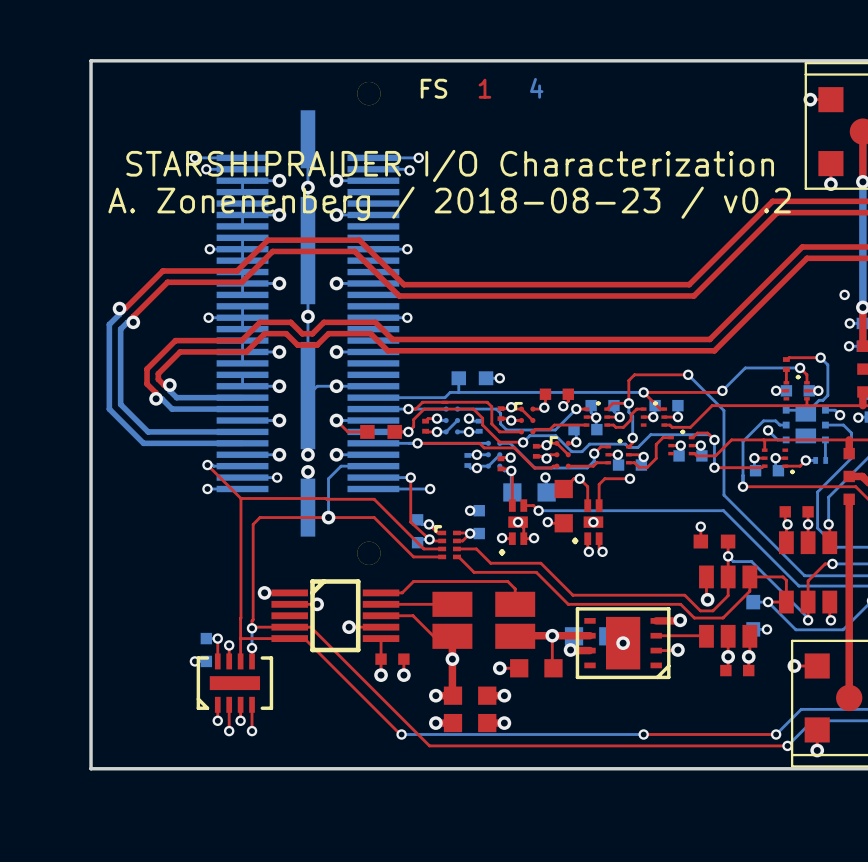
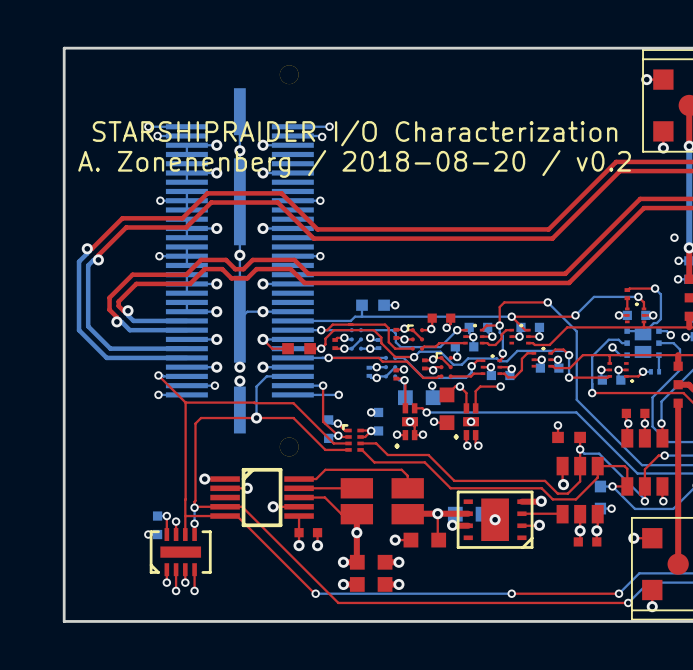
text: FS (433, 88) -> none
text: 1 (484, 88) -> none
text: 4 (536, 88) -> none
text: A. Zonenenberg / 2018-08-23 / v0.2 (449, 203) -> A. Zonenenberg / 2018-08-20 / v0.2 (354, 163)

